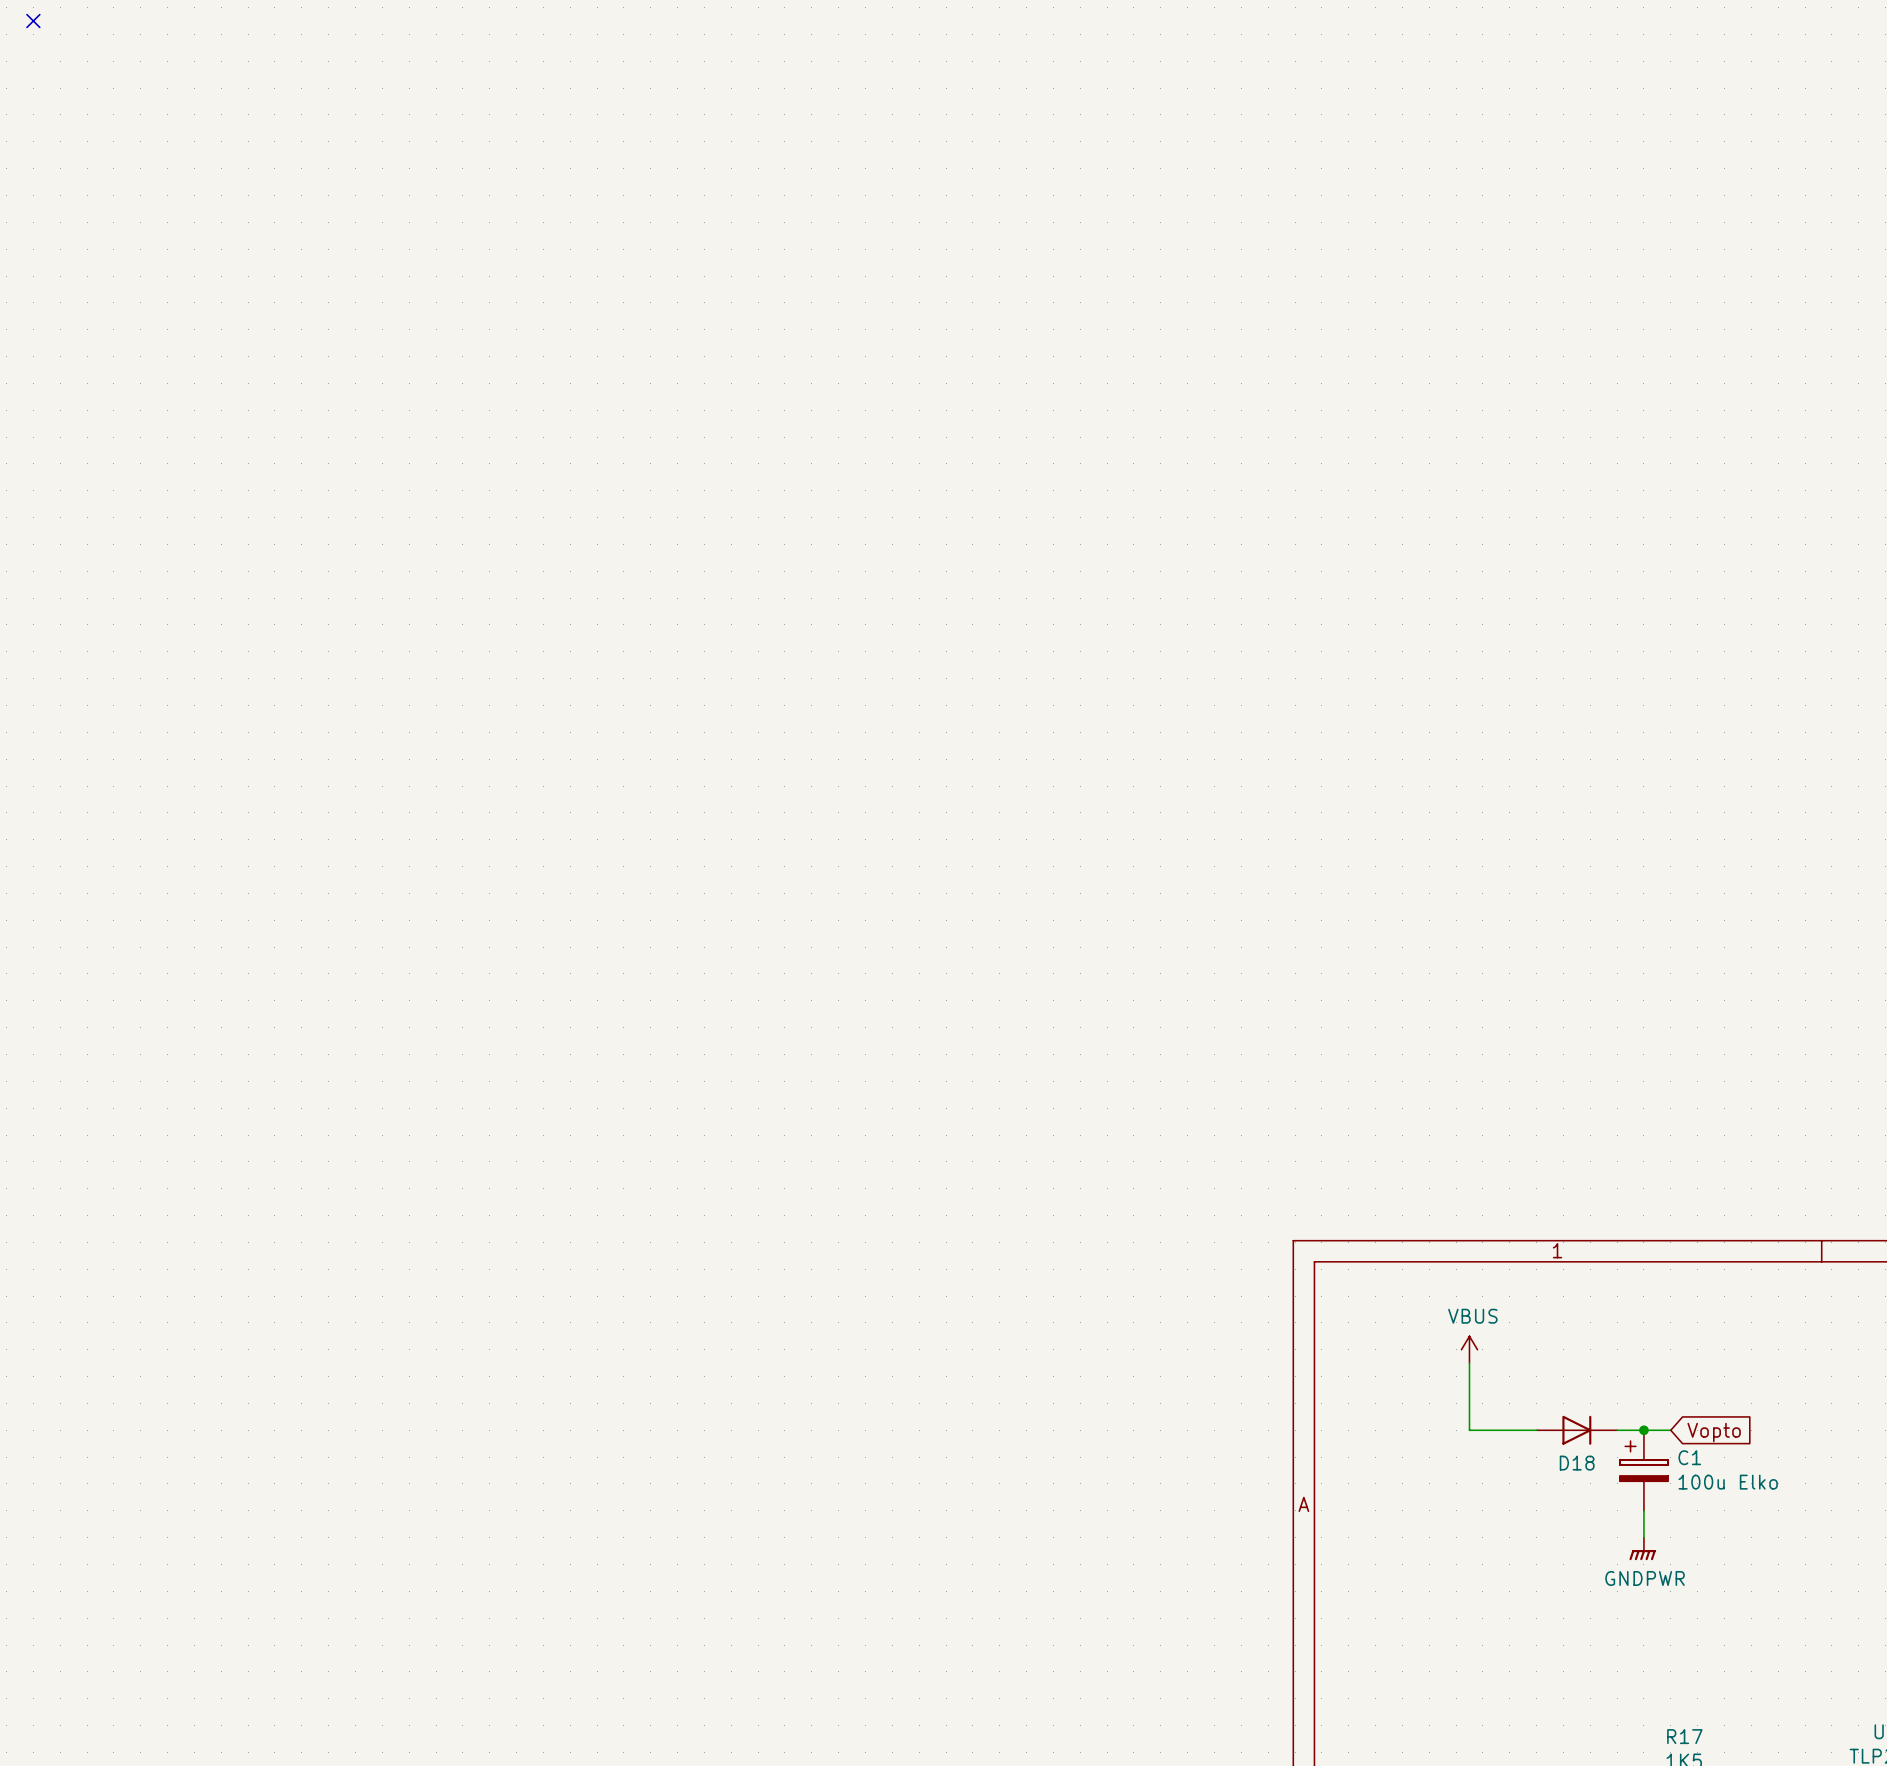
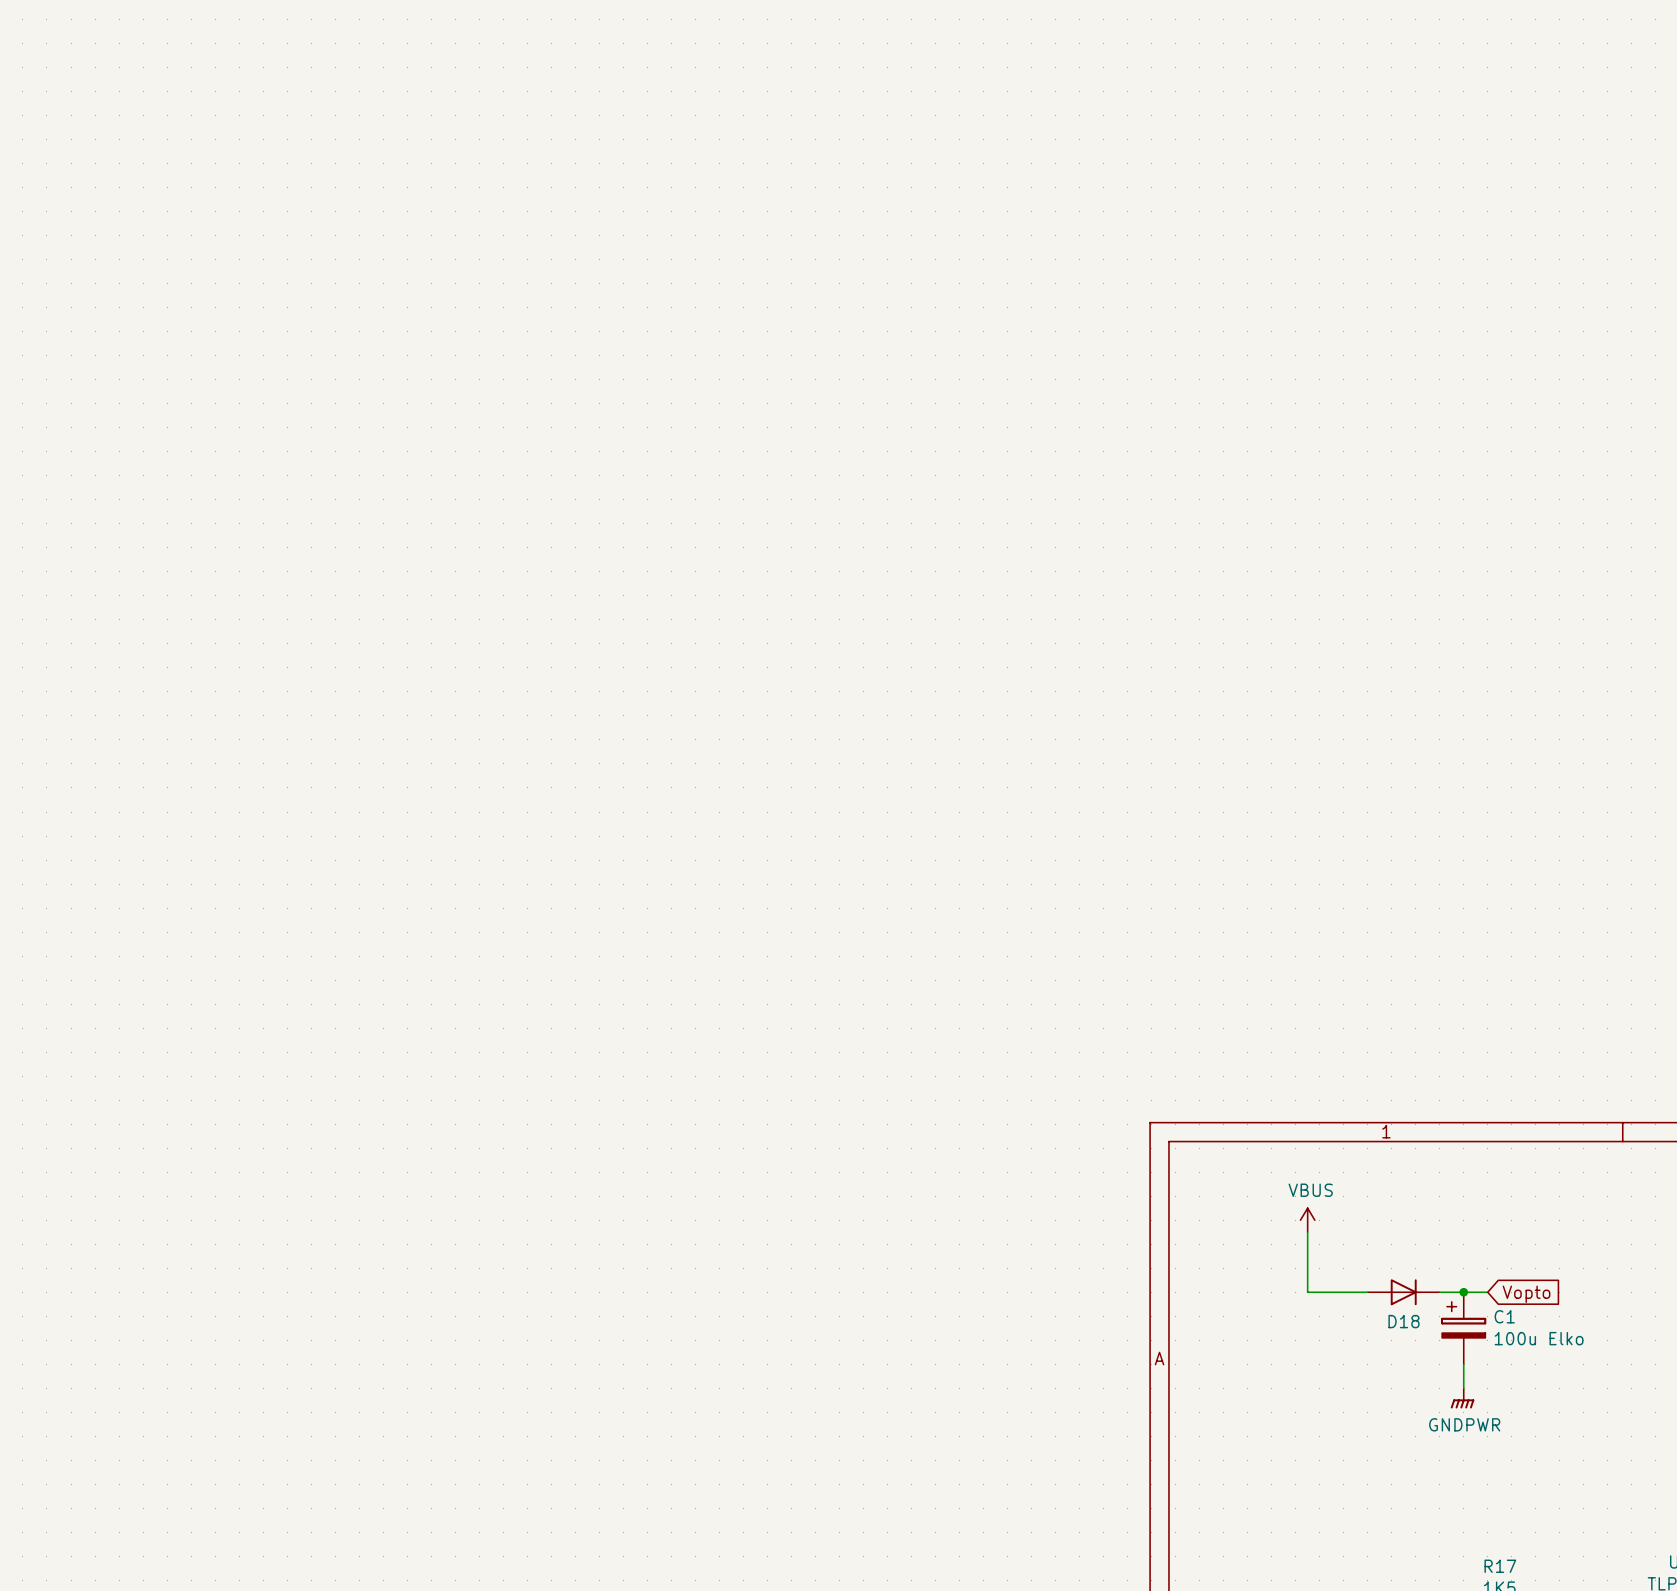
no-connect mark: (33, 21) -> none

